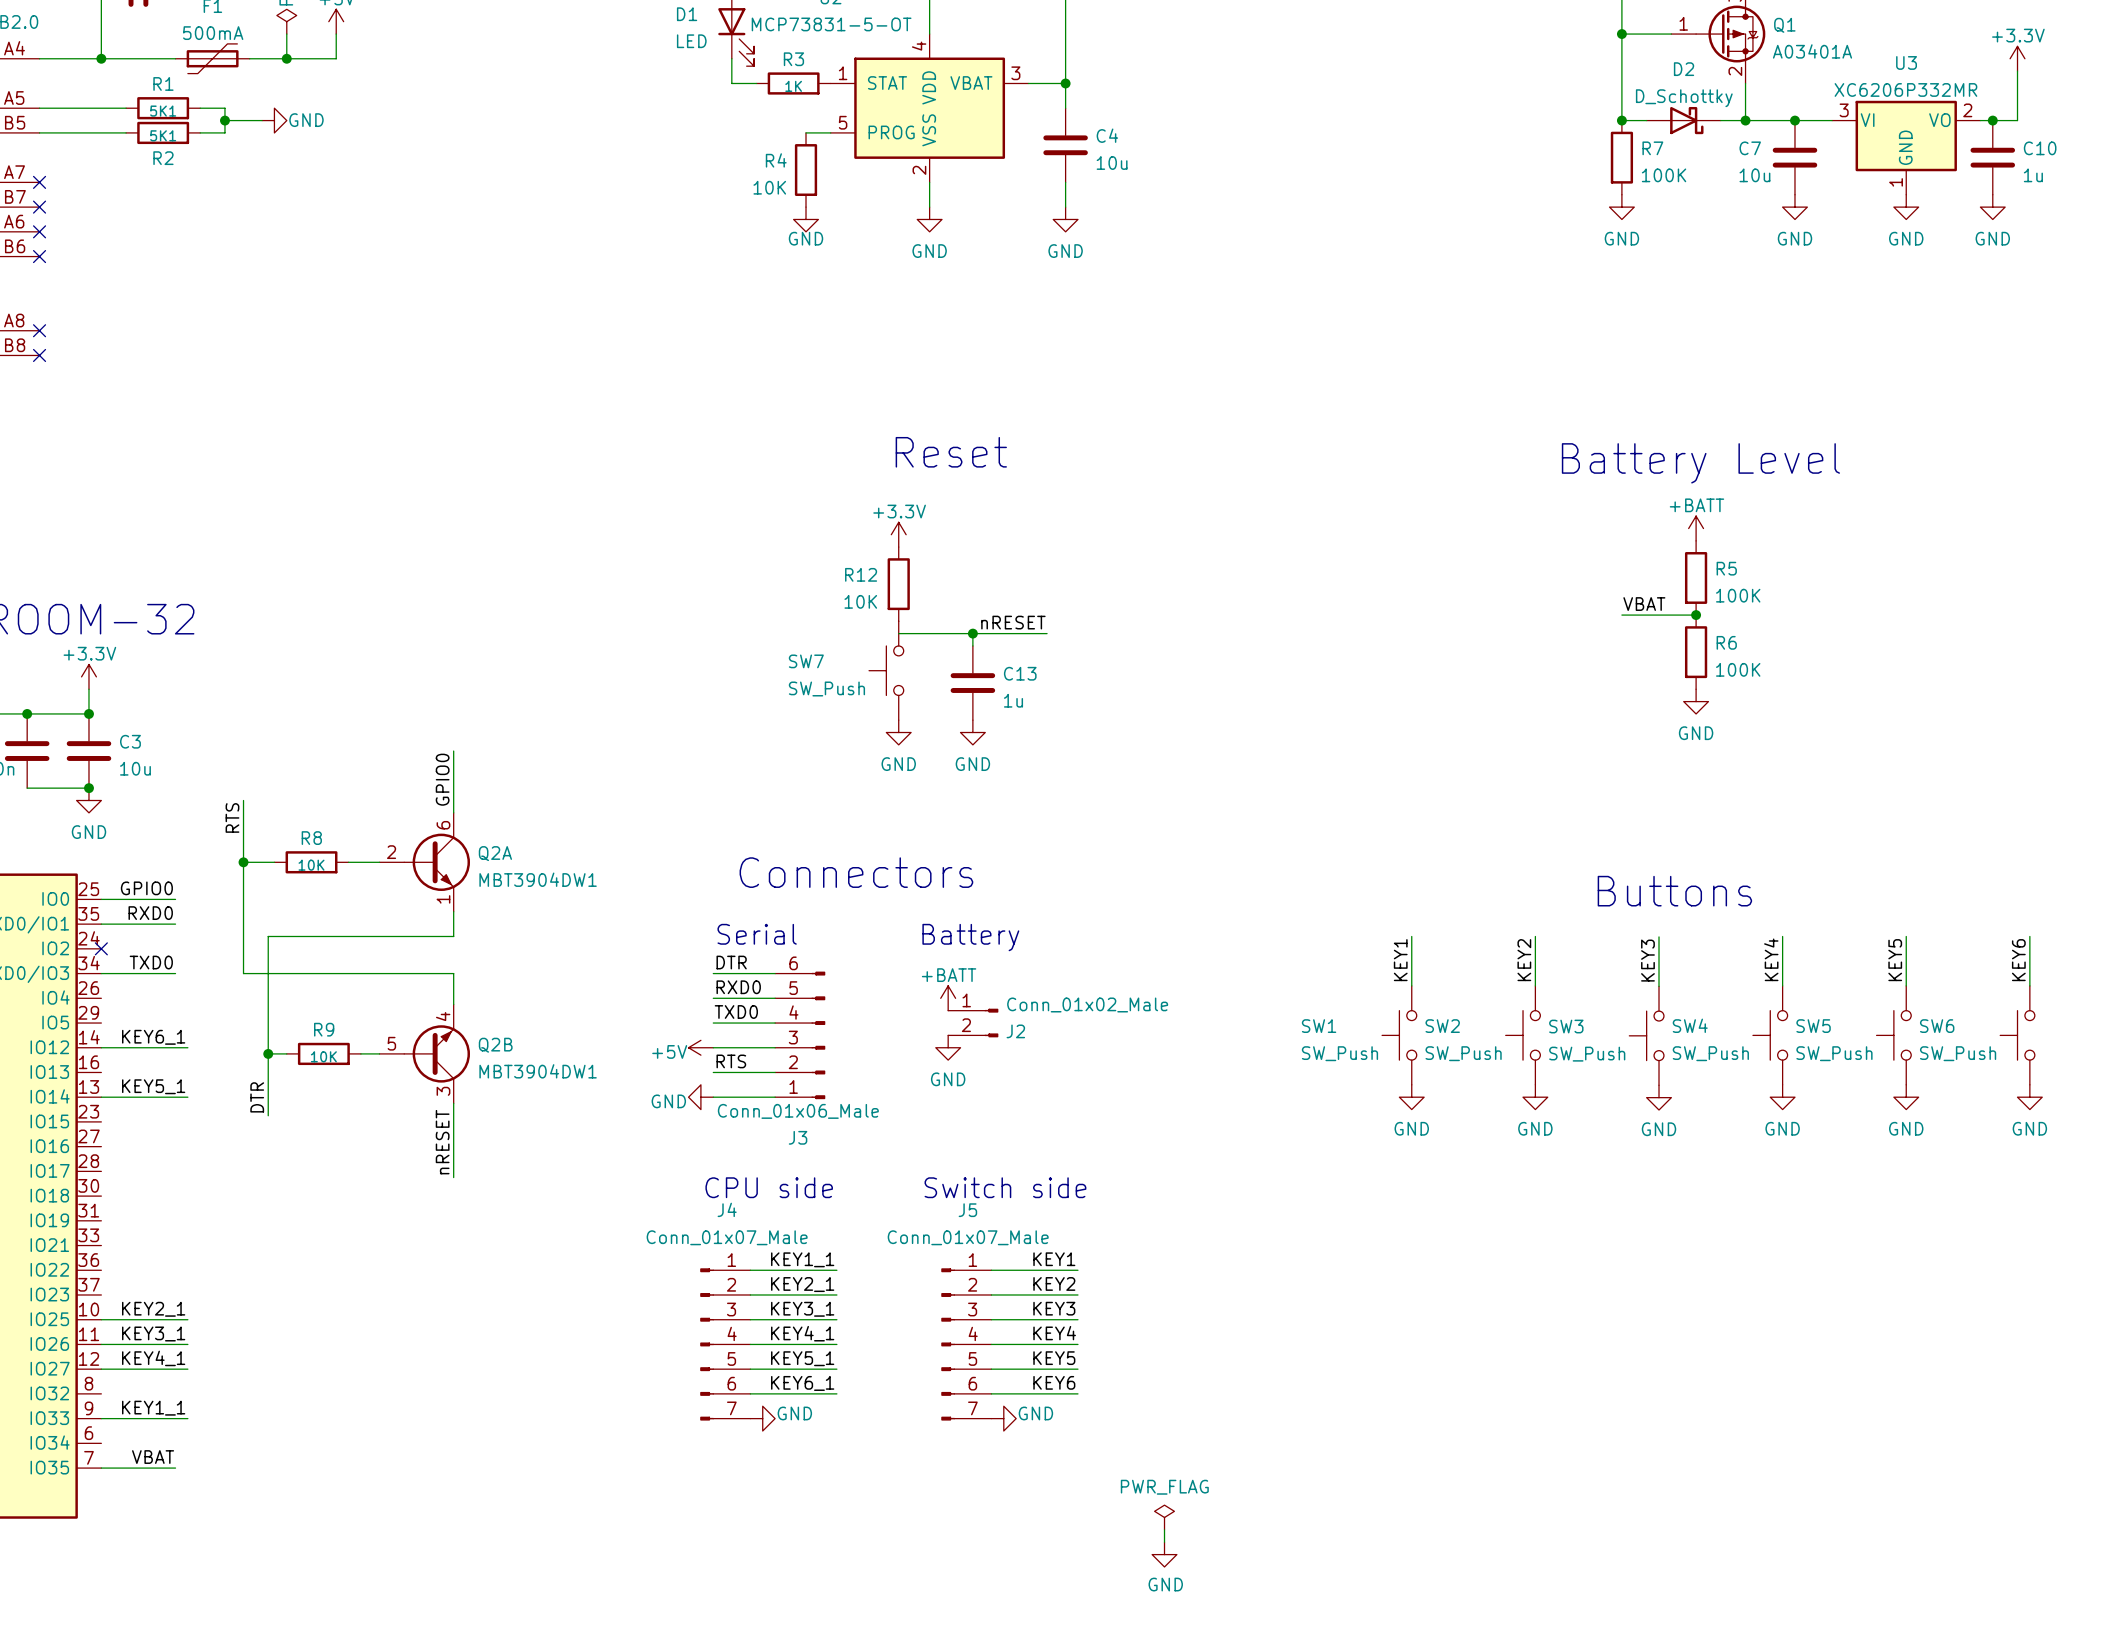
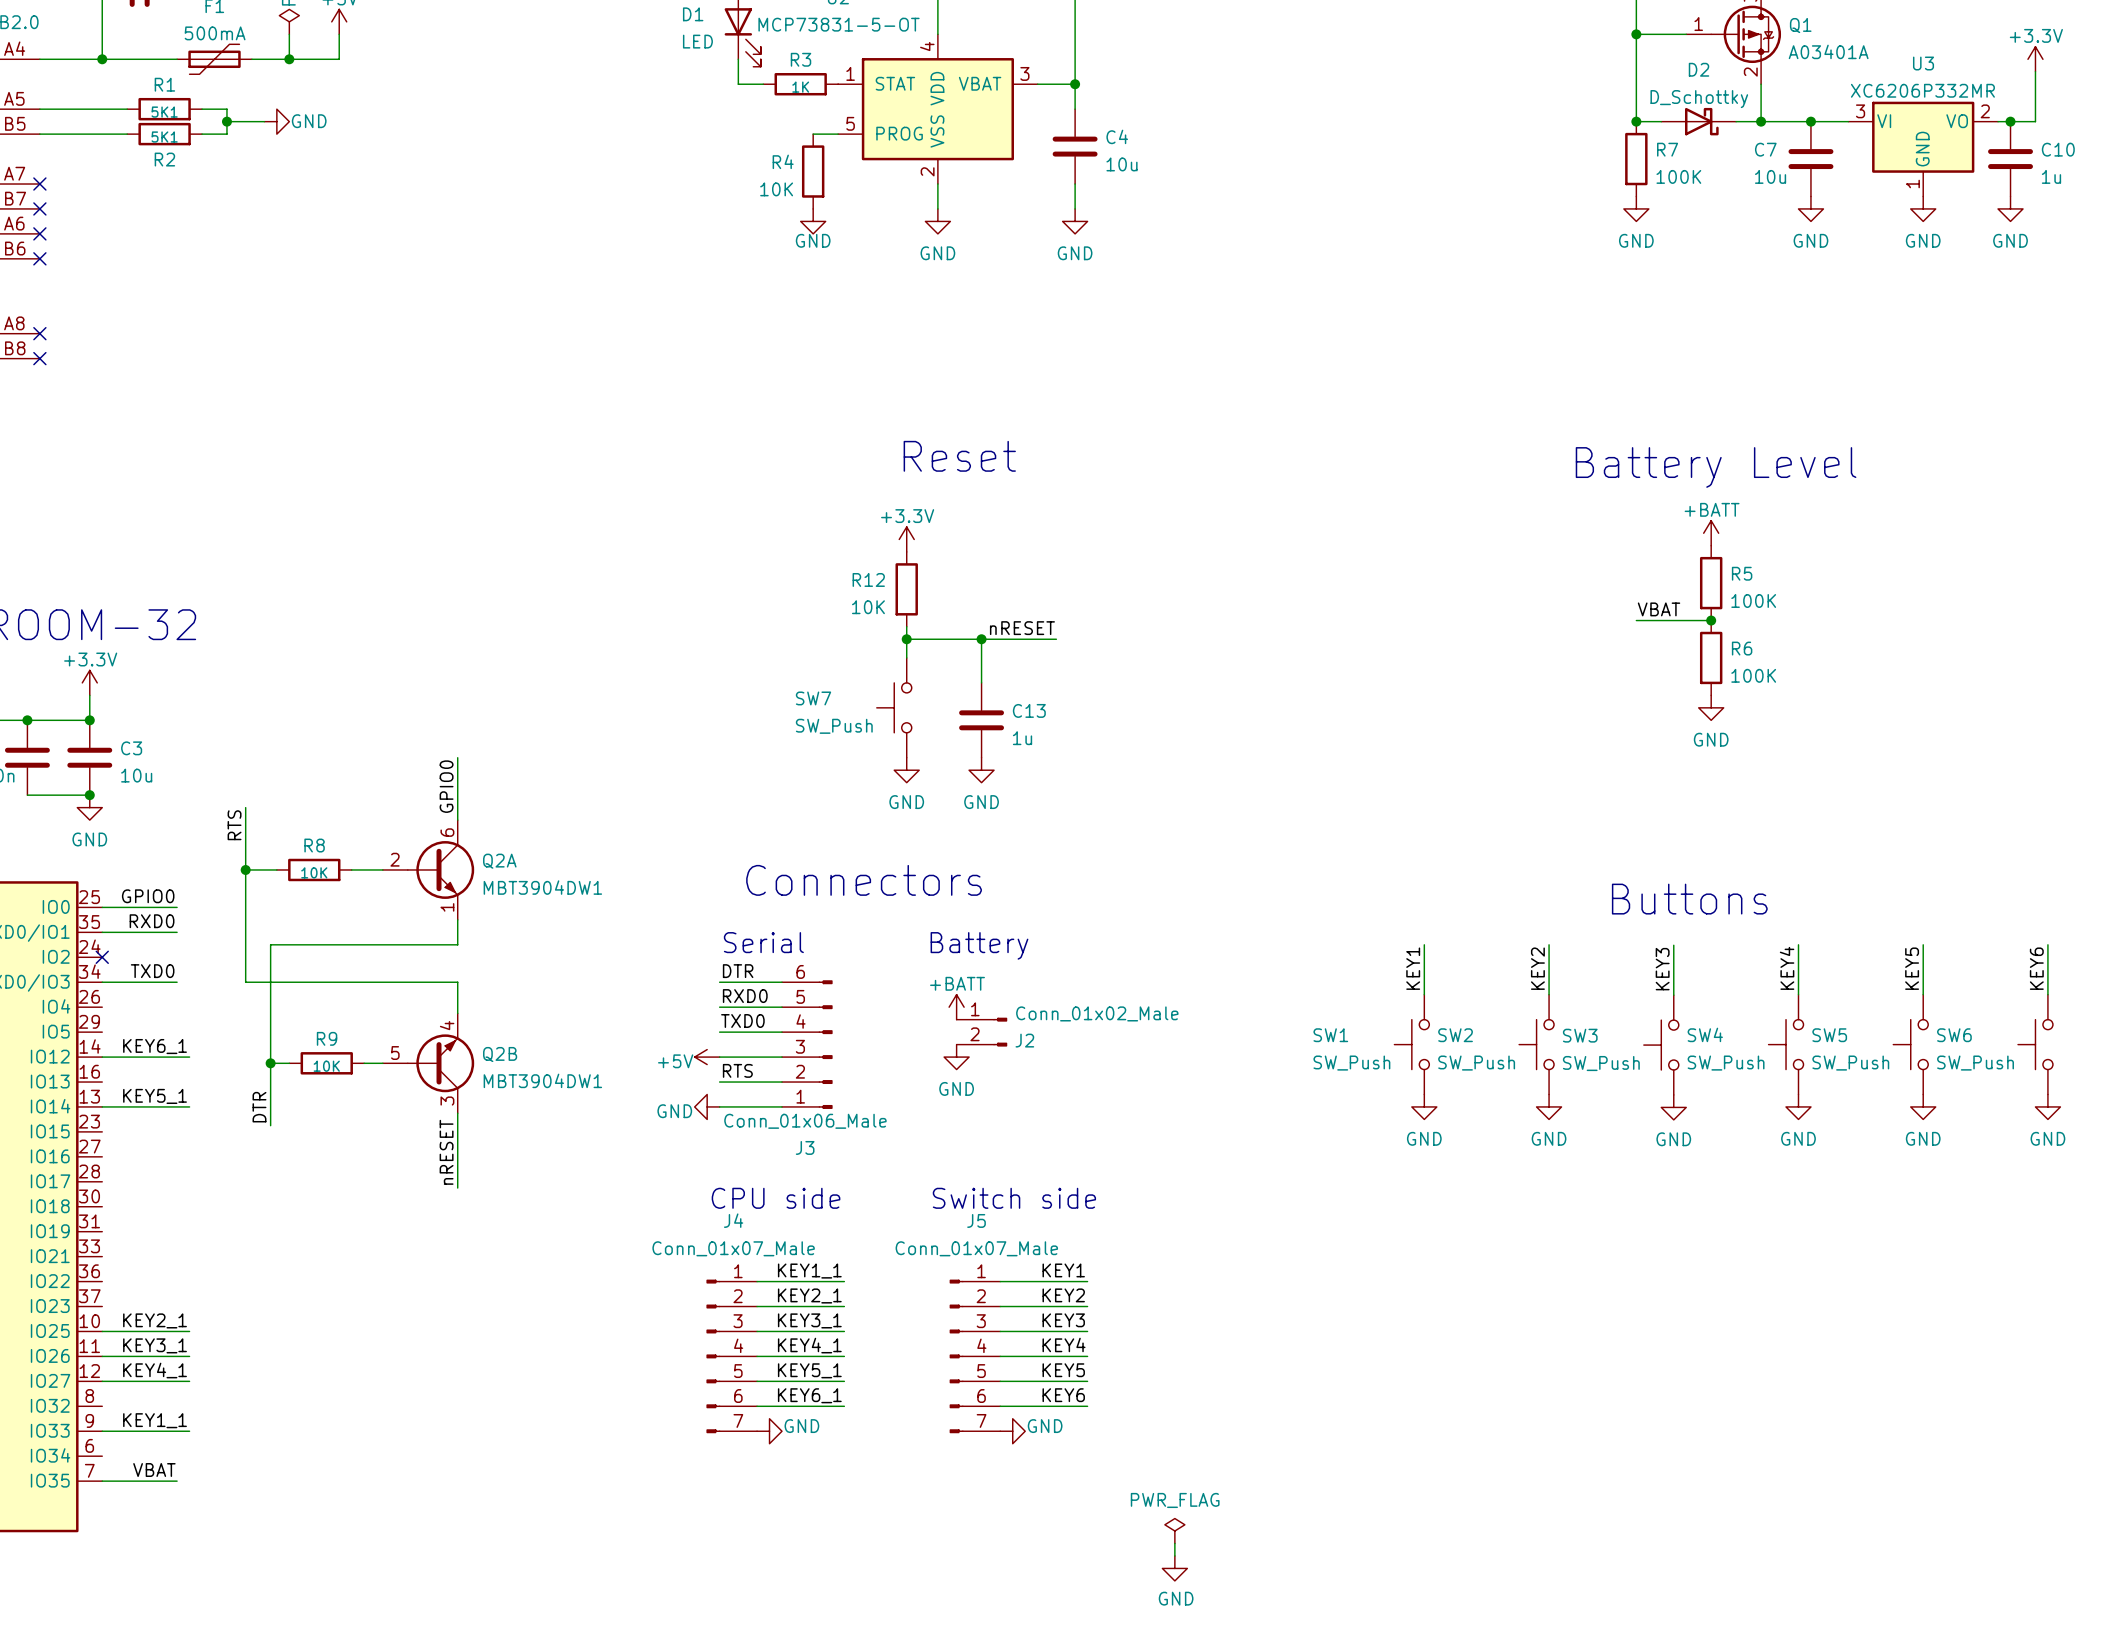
junction: none -> (906, 639)
SW7 position: (886, 670) -> (894, 707)
C13 position: (972, 683) -> (981, 720)
power symbol position: GND (898, 732) -> GND (906, 770)
power symbol position: GND (972, 732) -> GND (981, 770)

